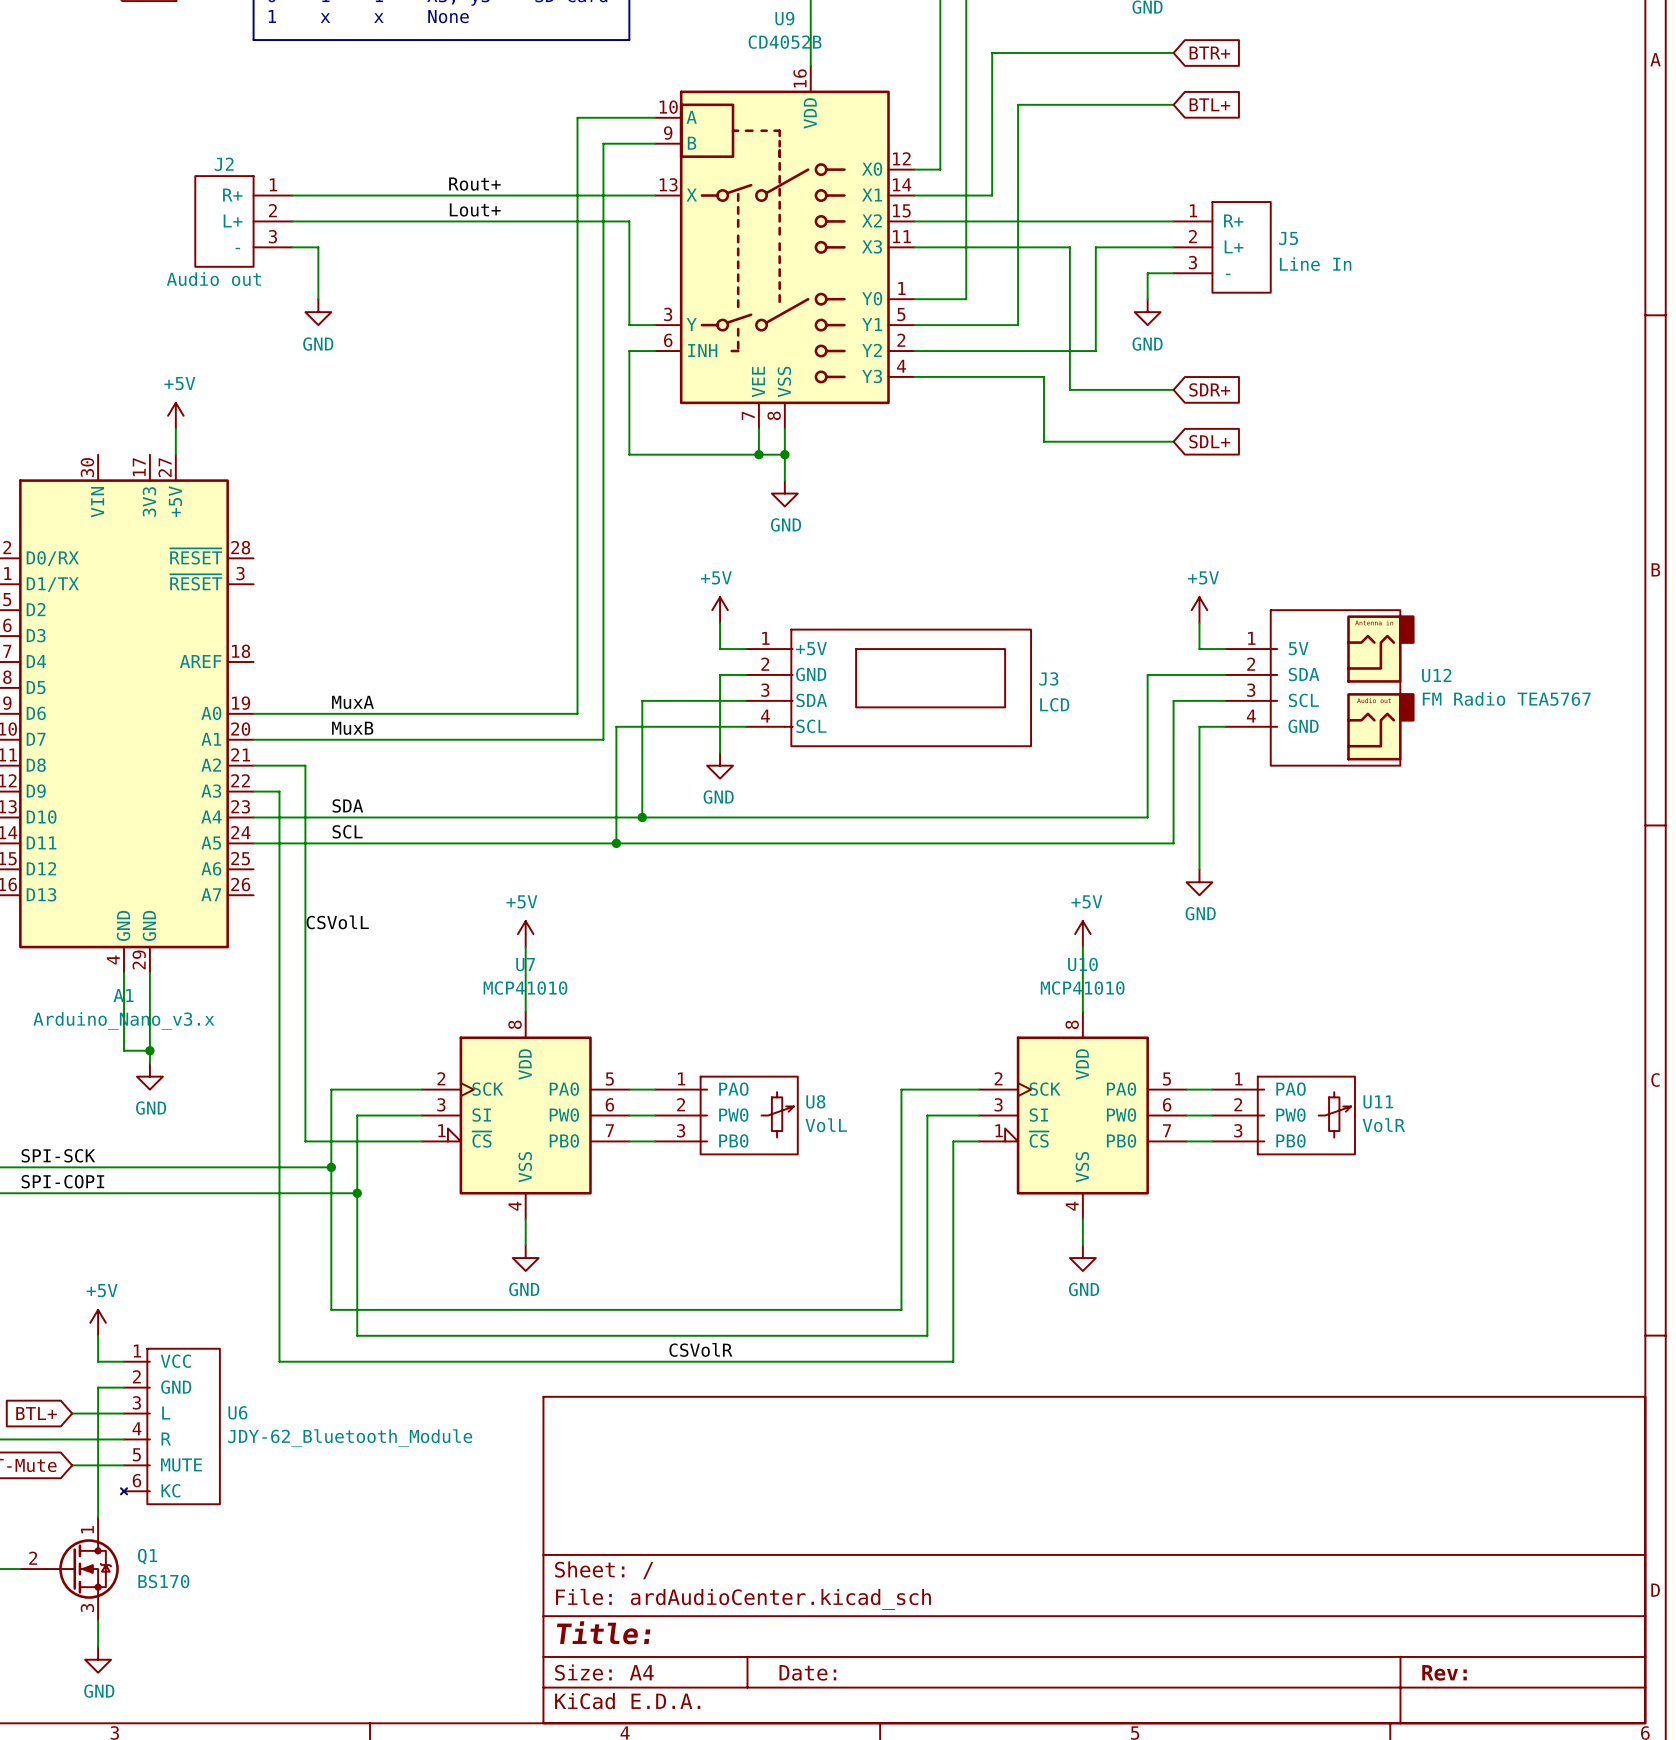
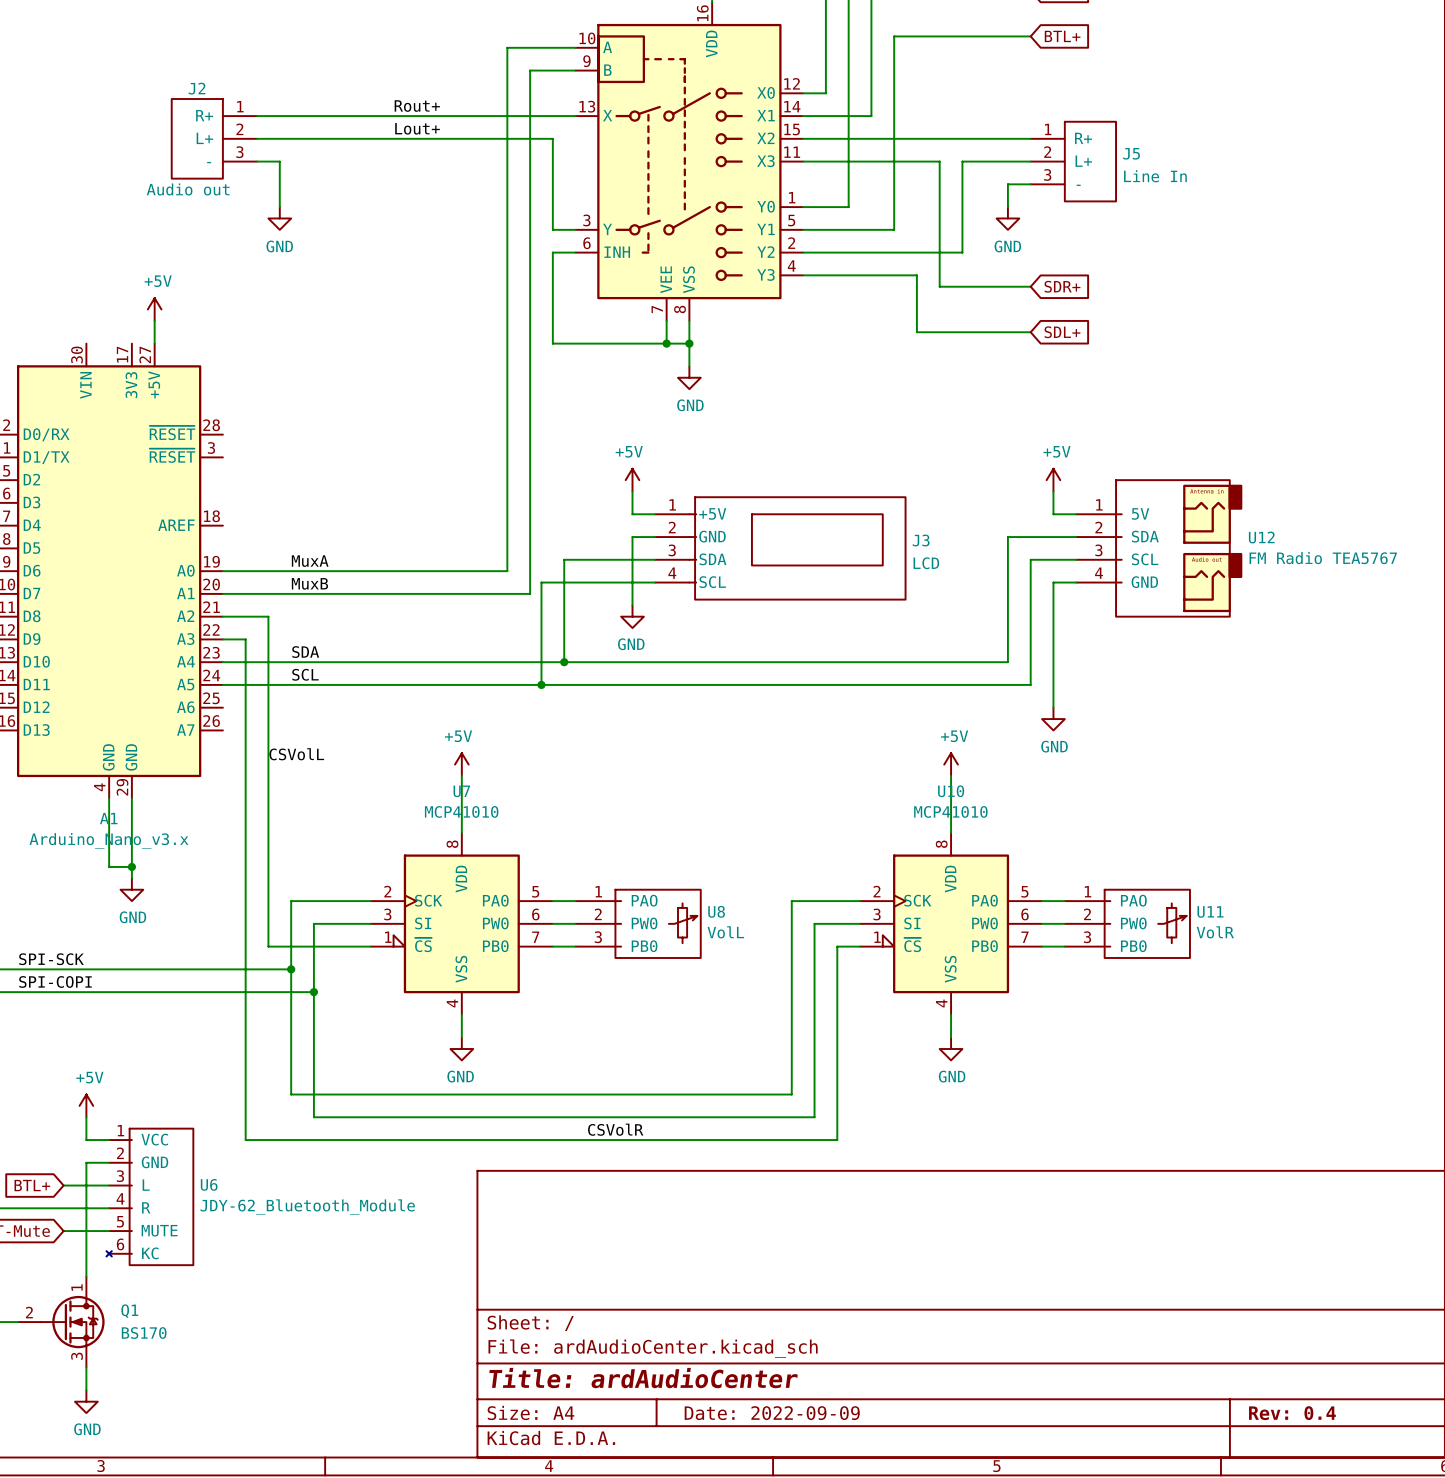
title block: Title: (603, 1632) -> Title: ardAudioCenter (643, 1378)
title block: Date: (807, 1672) -> Date: 2022-09-09 (772, 1413)
title block: Rev: (1444, 1672) -> Rev: 0.4 (1292, 1413)

